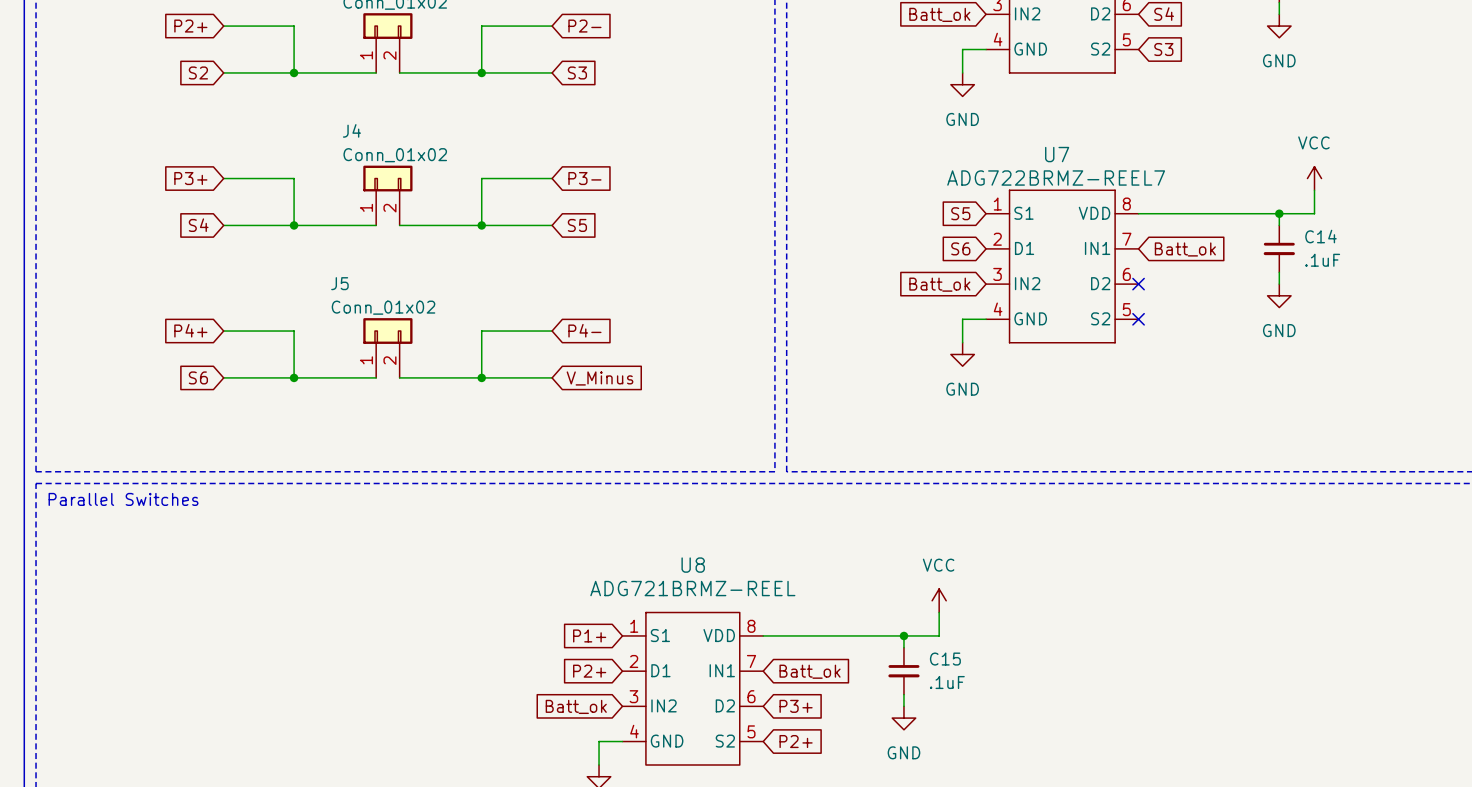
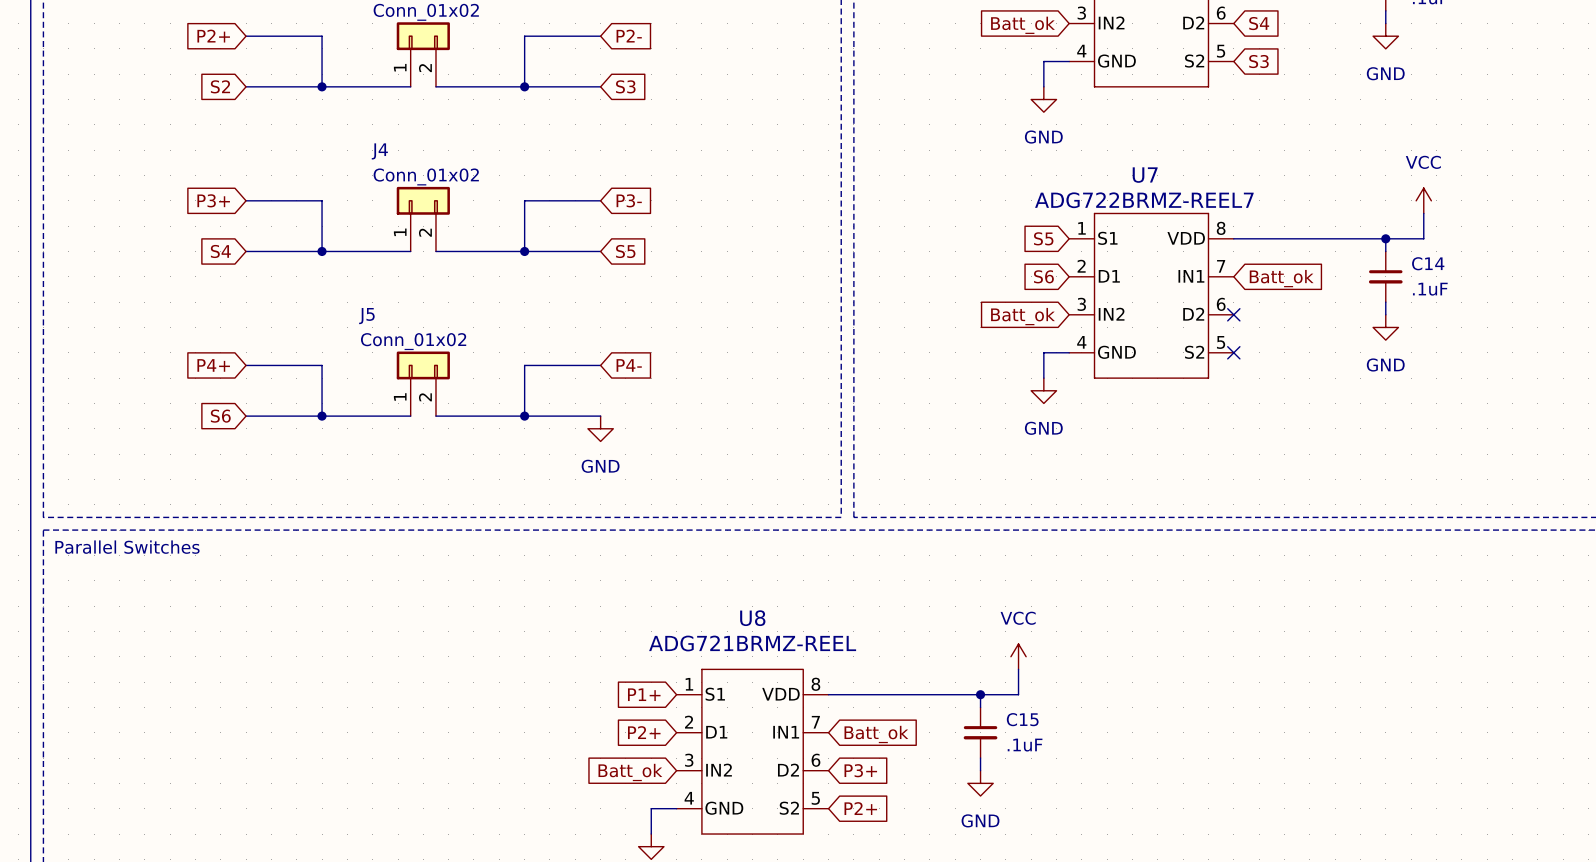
global label: V_Minus (600, 378) -> none
power symbol: none -> GND (600, 428)

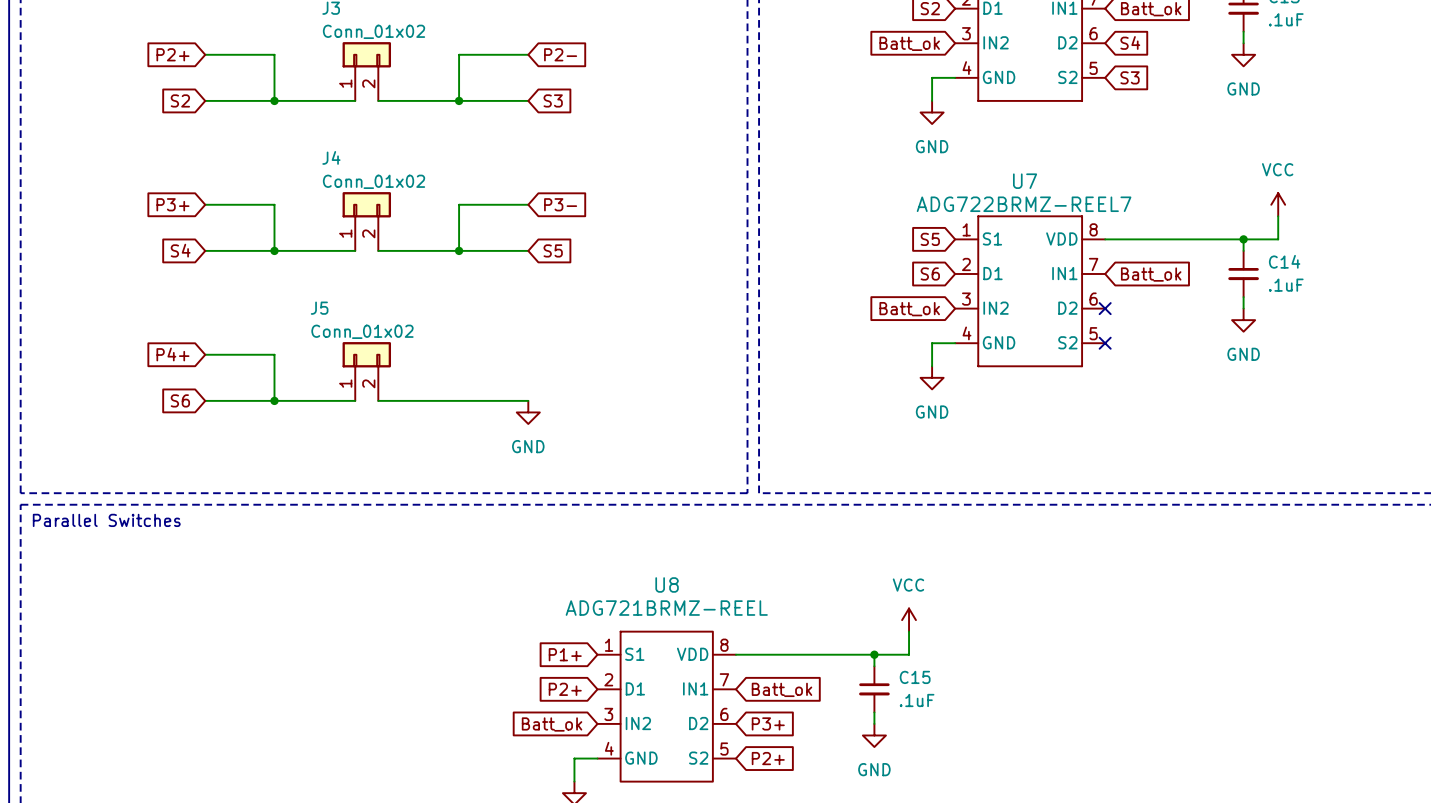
wire: (600, 365) (524, 365) (524, 416) -> none
global label: P4- (629, 365) -> none
junction: (524, 416) -> none

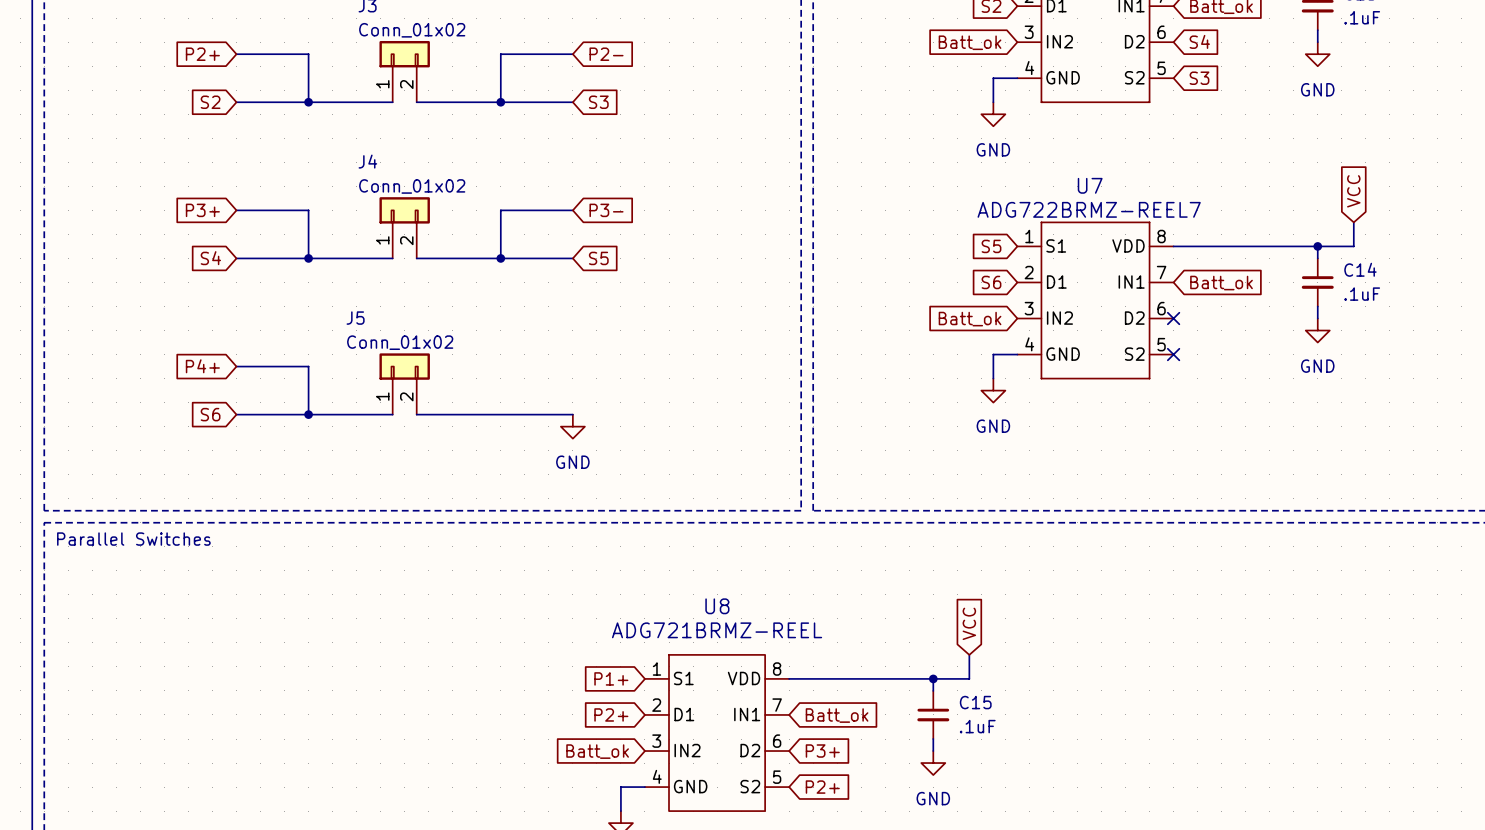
global label: none -> VCC (1353, 191)
power symbol: VCC (1278, 204) -> none
global label: none -> VCC (969, 623)
power symbol: VCC (909, 620) -> none

